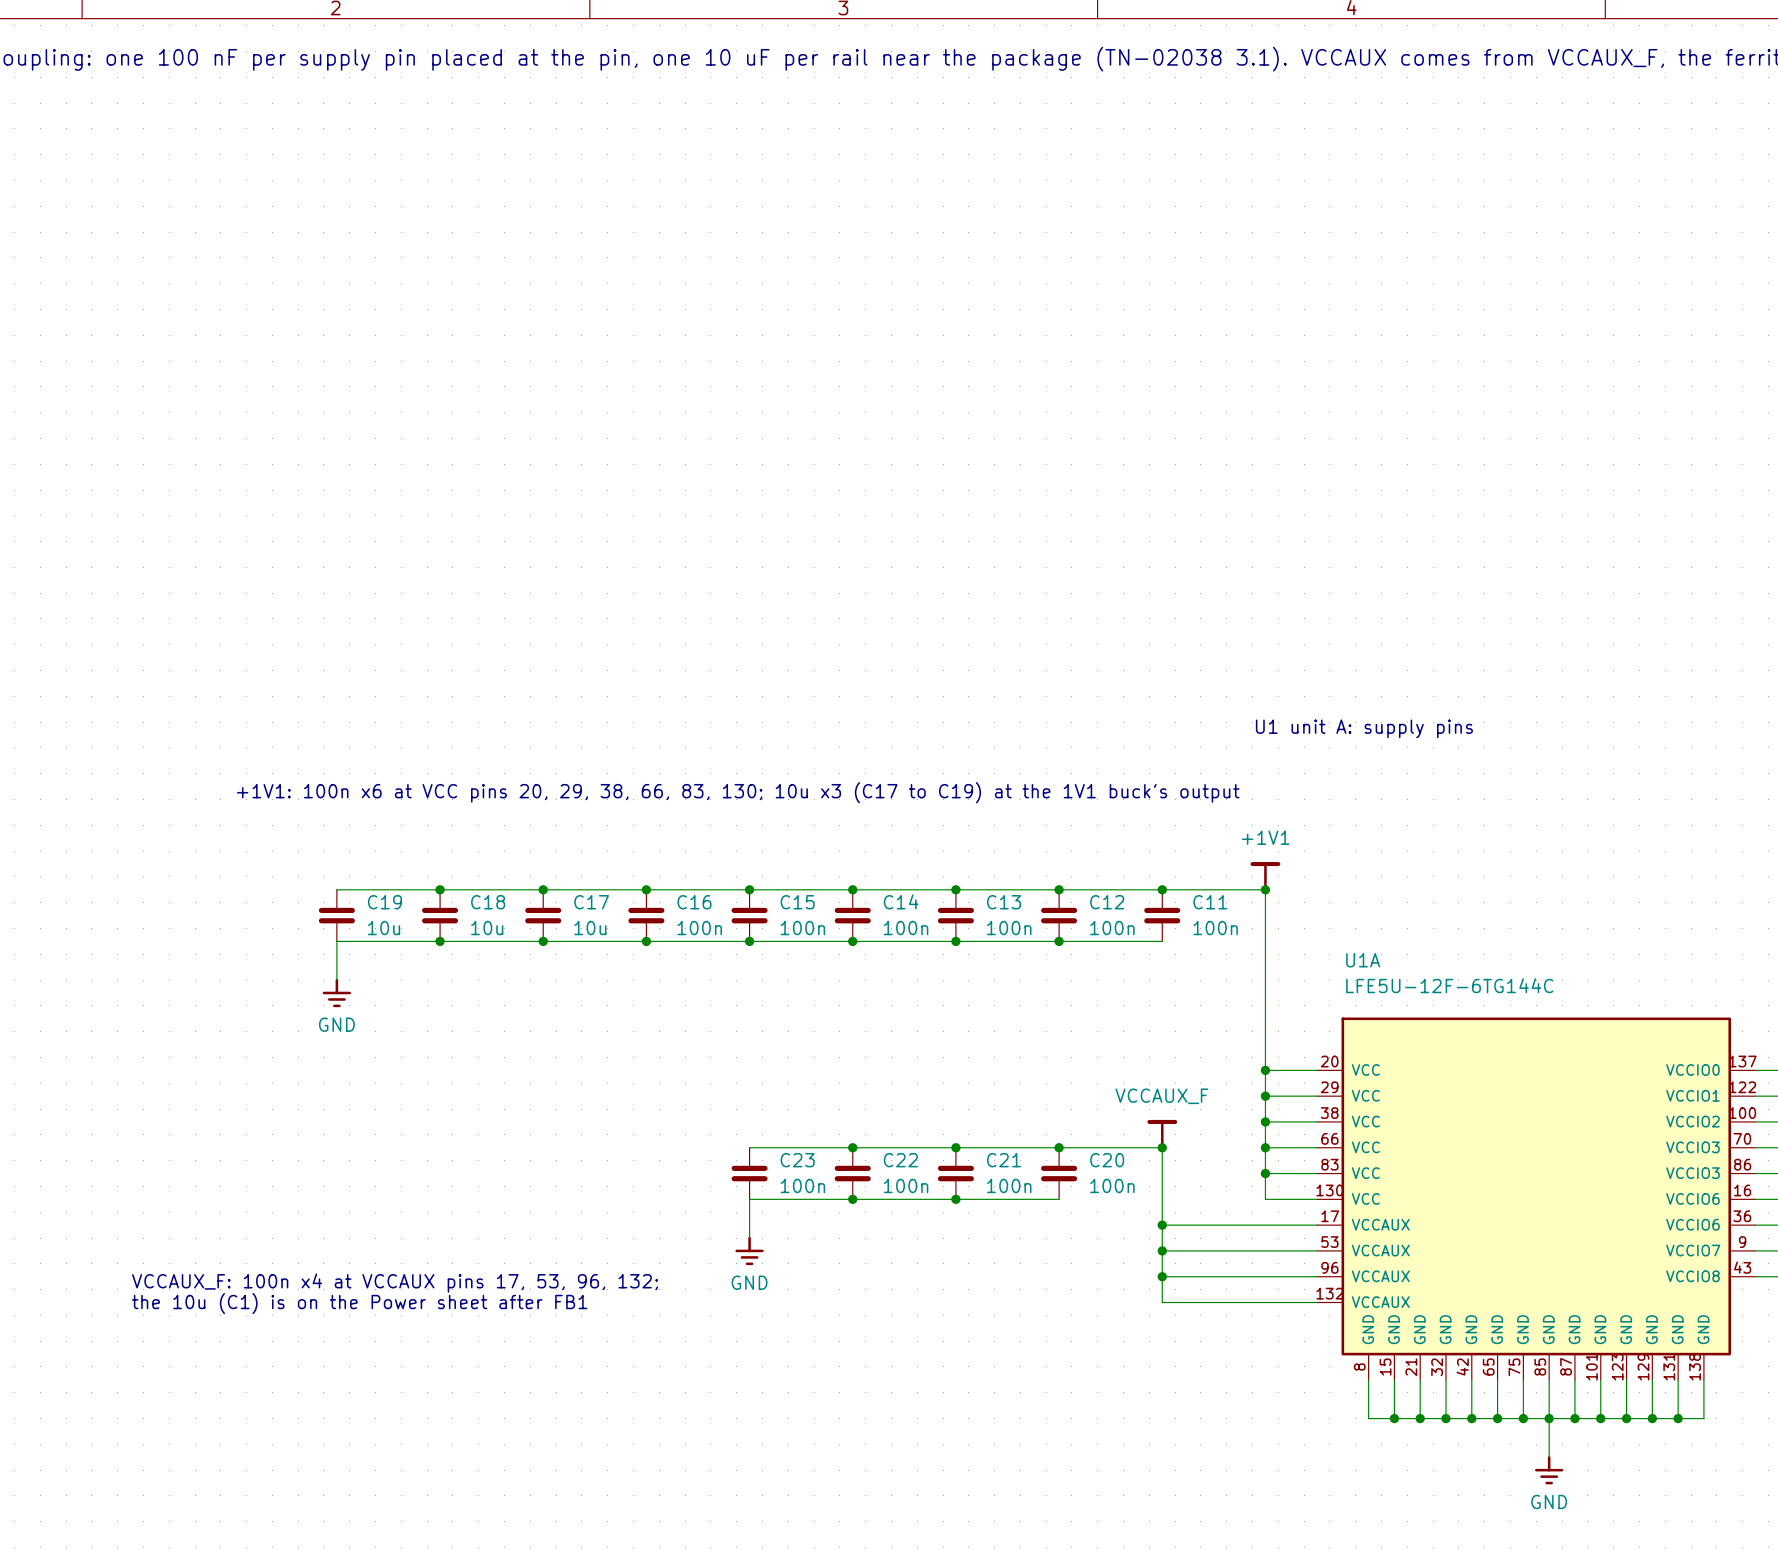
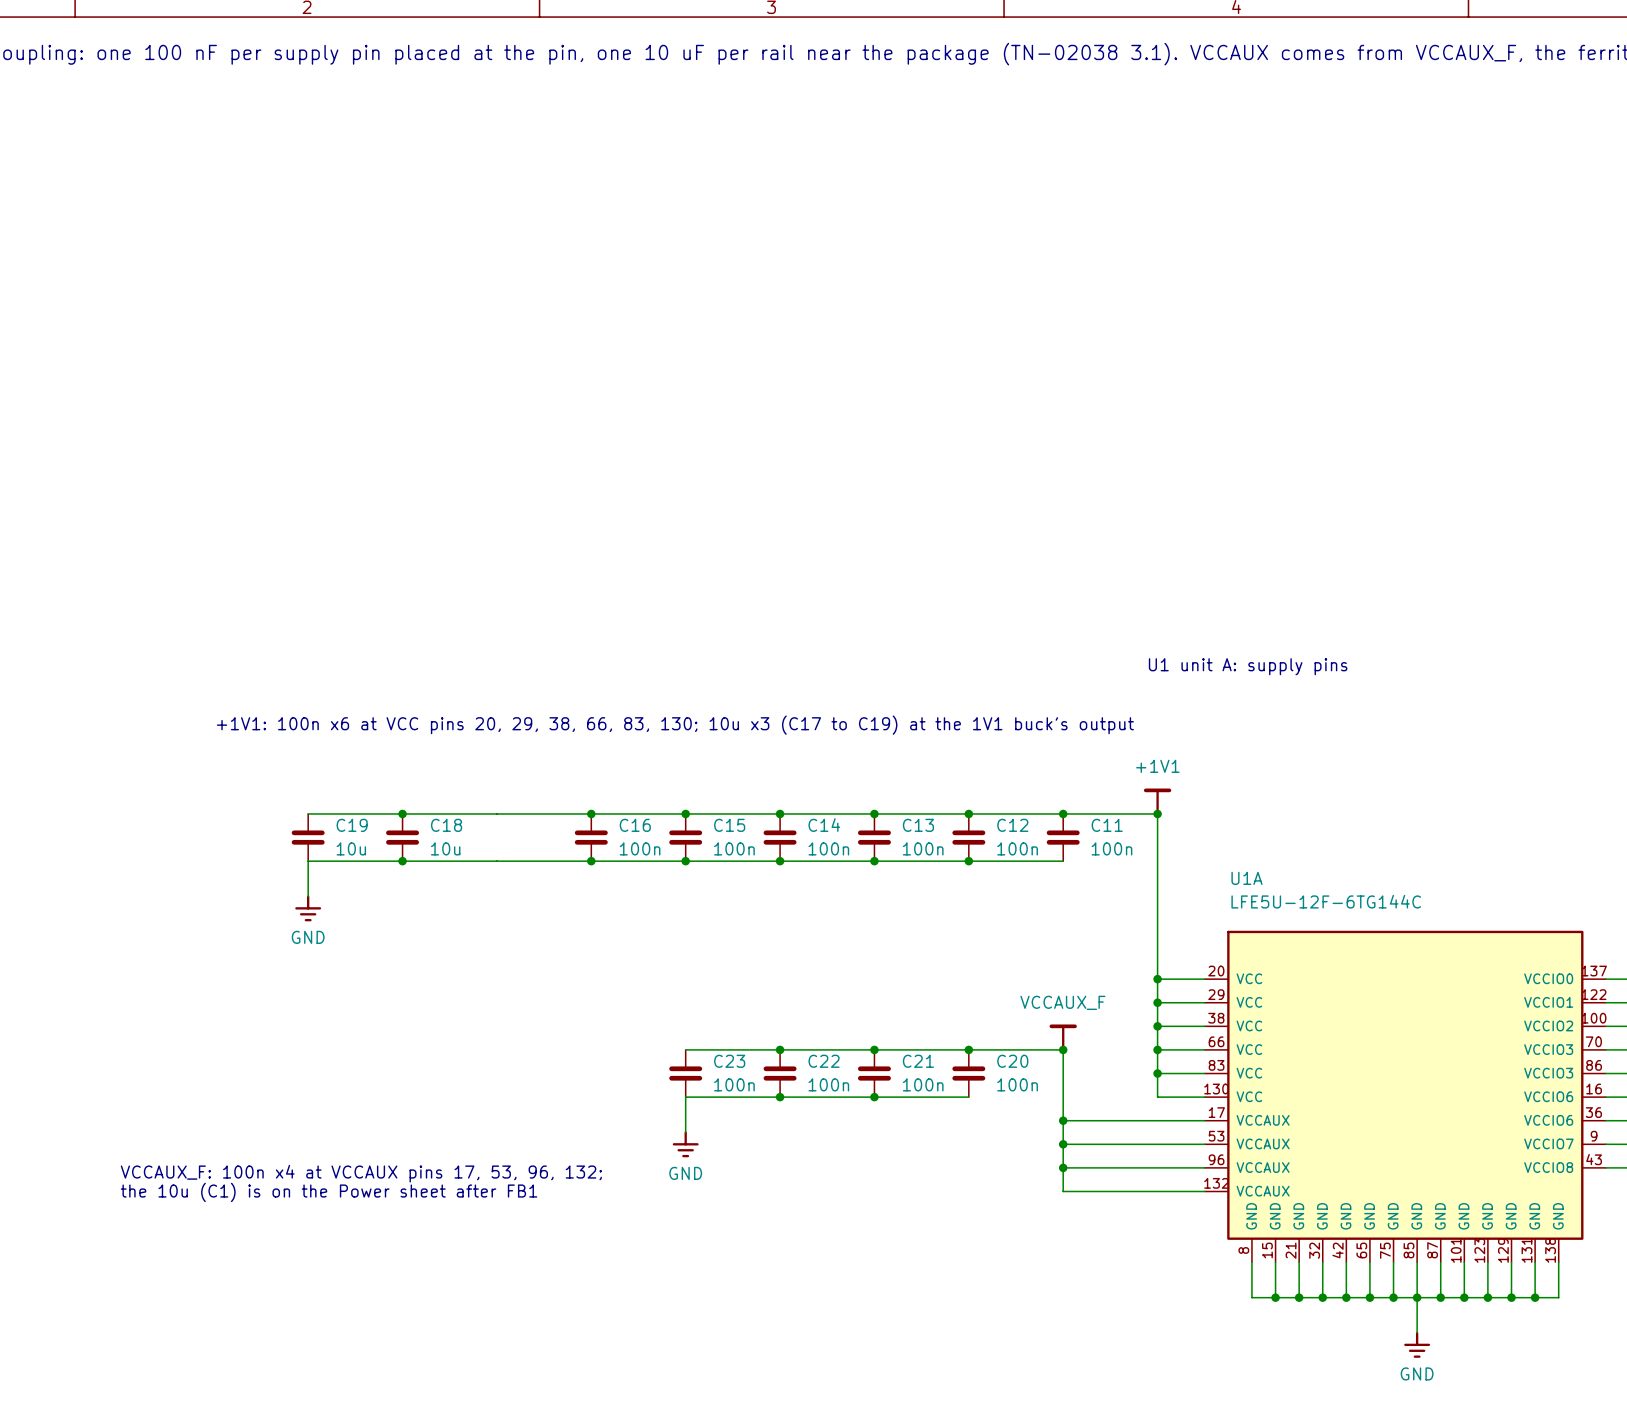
junction: (543, 889) -> none
C17: 10u (543, 915) -> none
junction: (543, 941) -> none

